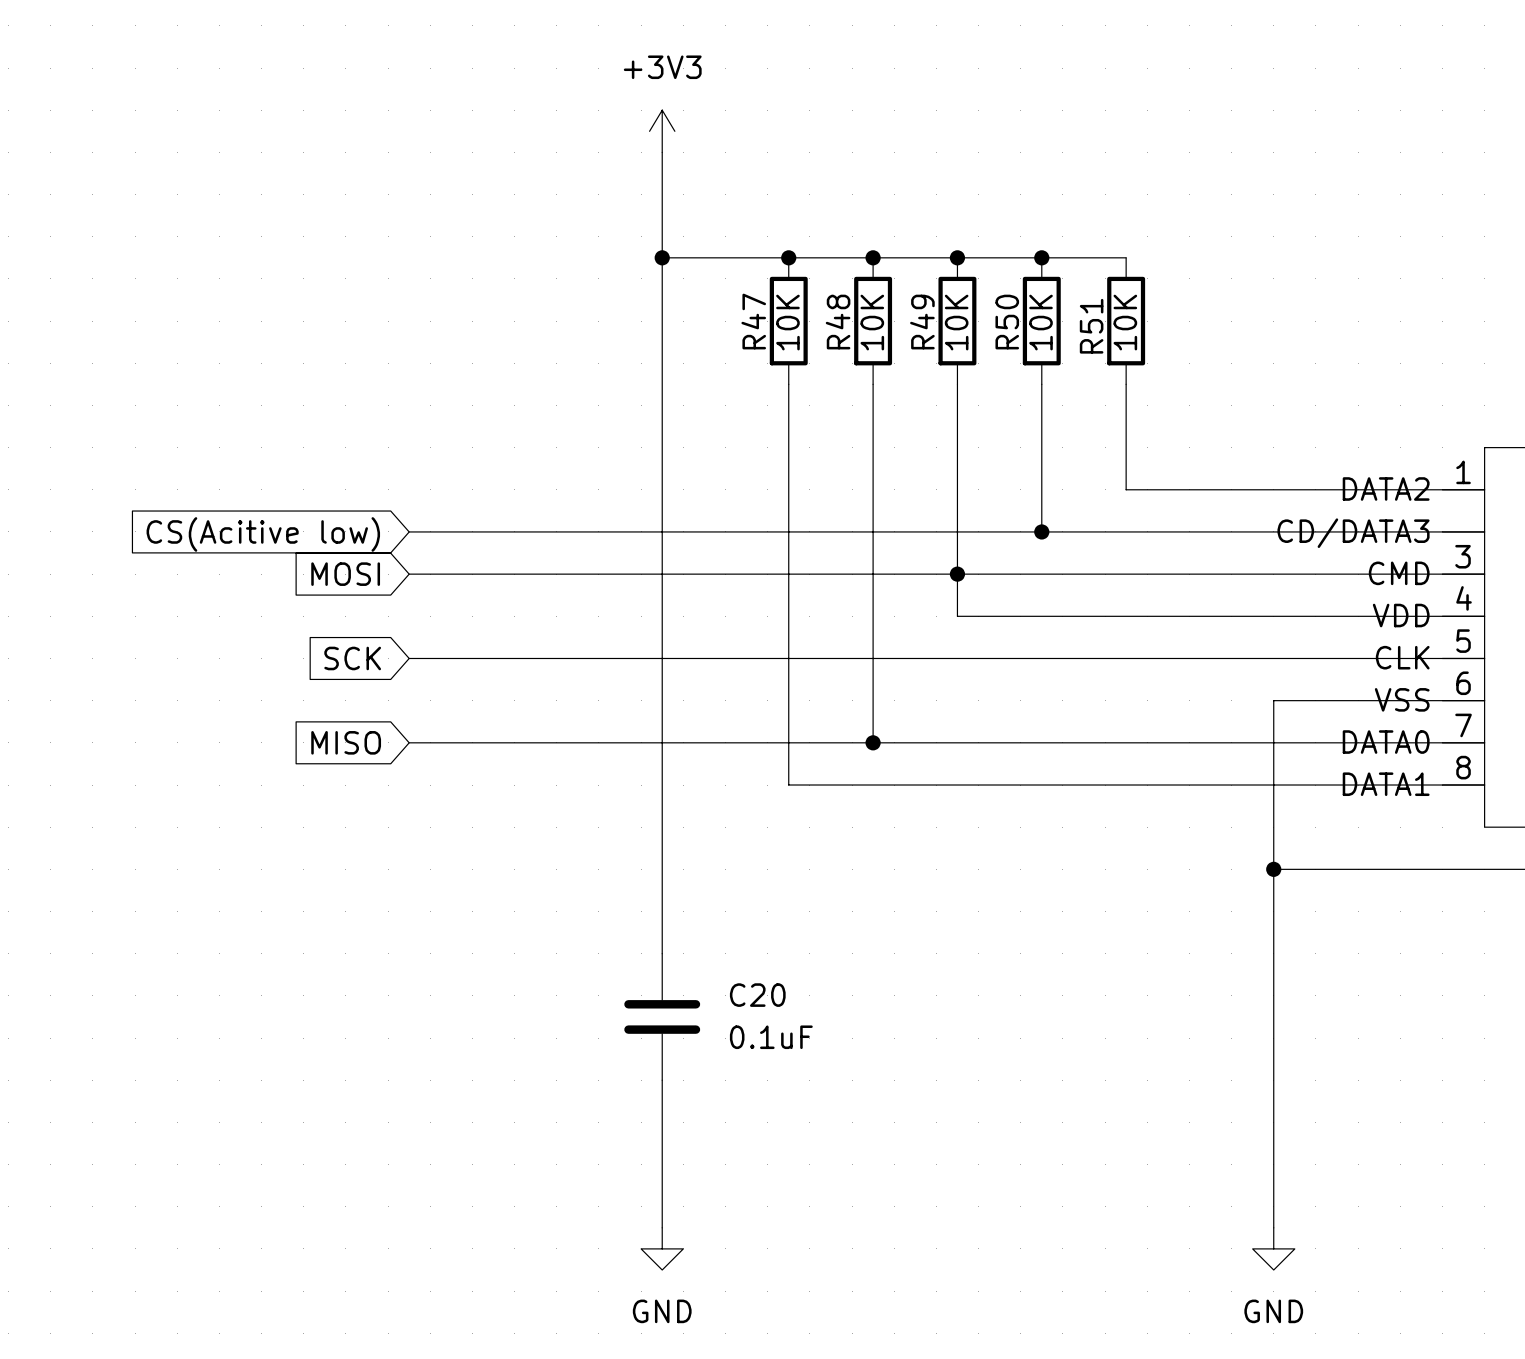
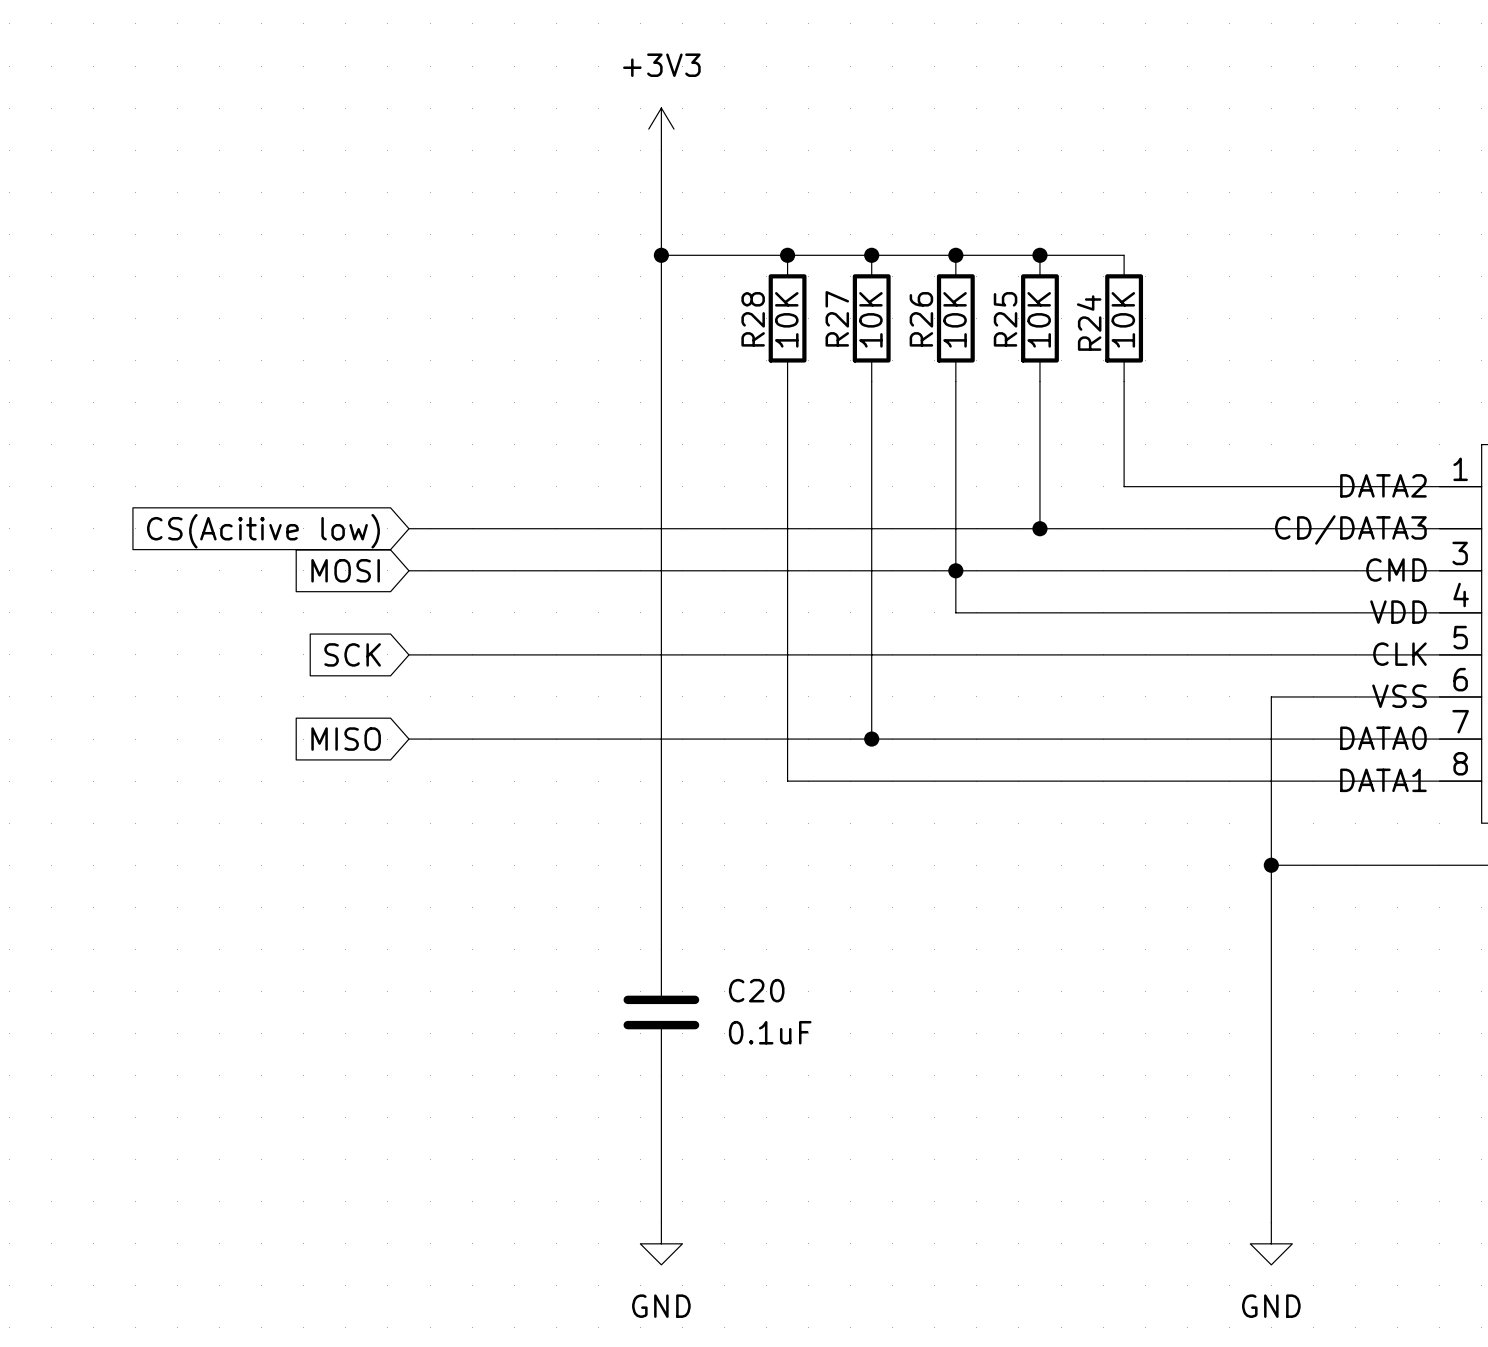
R47 name: R47 (753, 321) -> R28 (753, 319)
R48 name: R48 (838, 322) -> R27 (837, 318)
R49 name: R49 (922, 322) -> R26 (921, 319)
R50 name: R50 (1007, 322) -> R25 (1005, 319)
R51 name: R51 (1091, 326) -> R24 (1089, 323)

